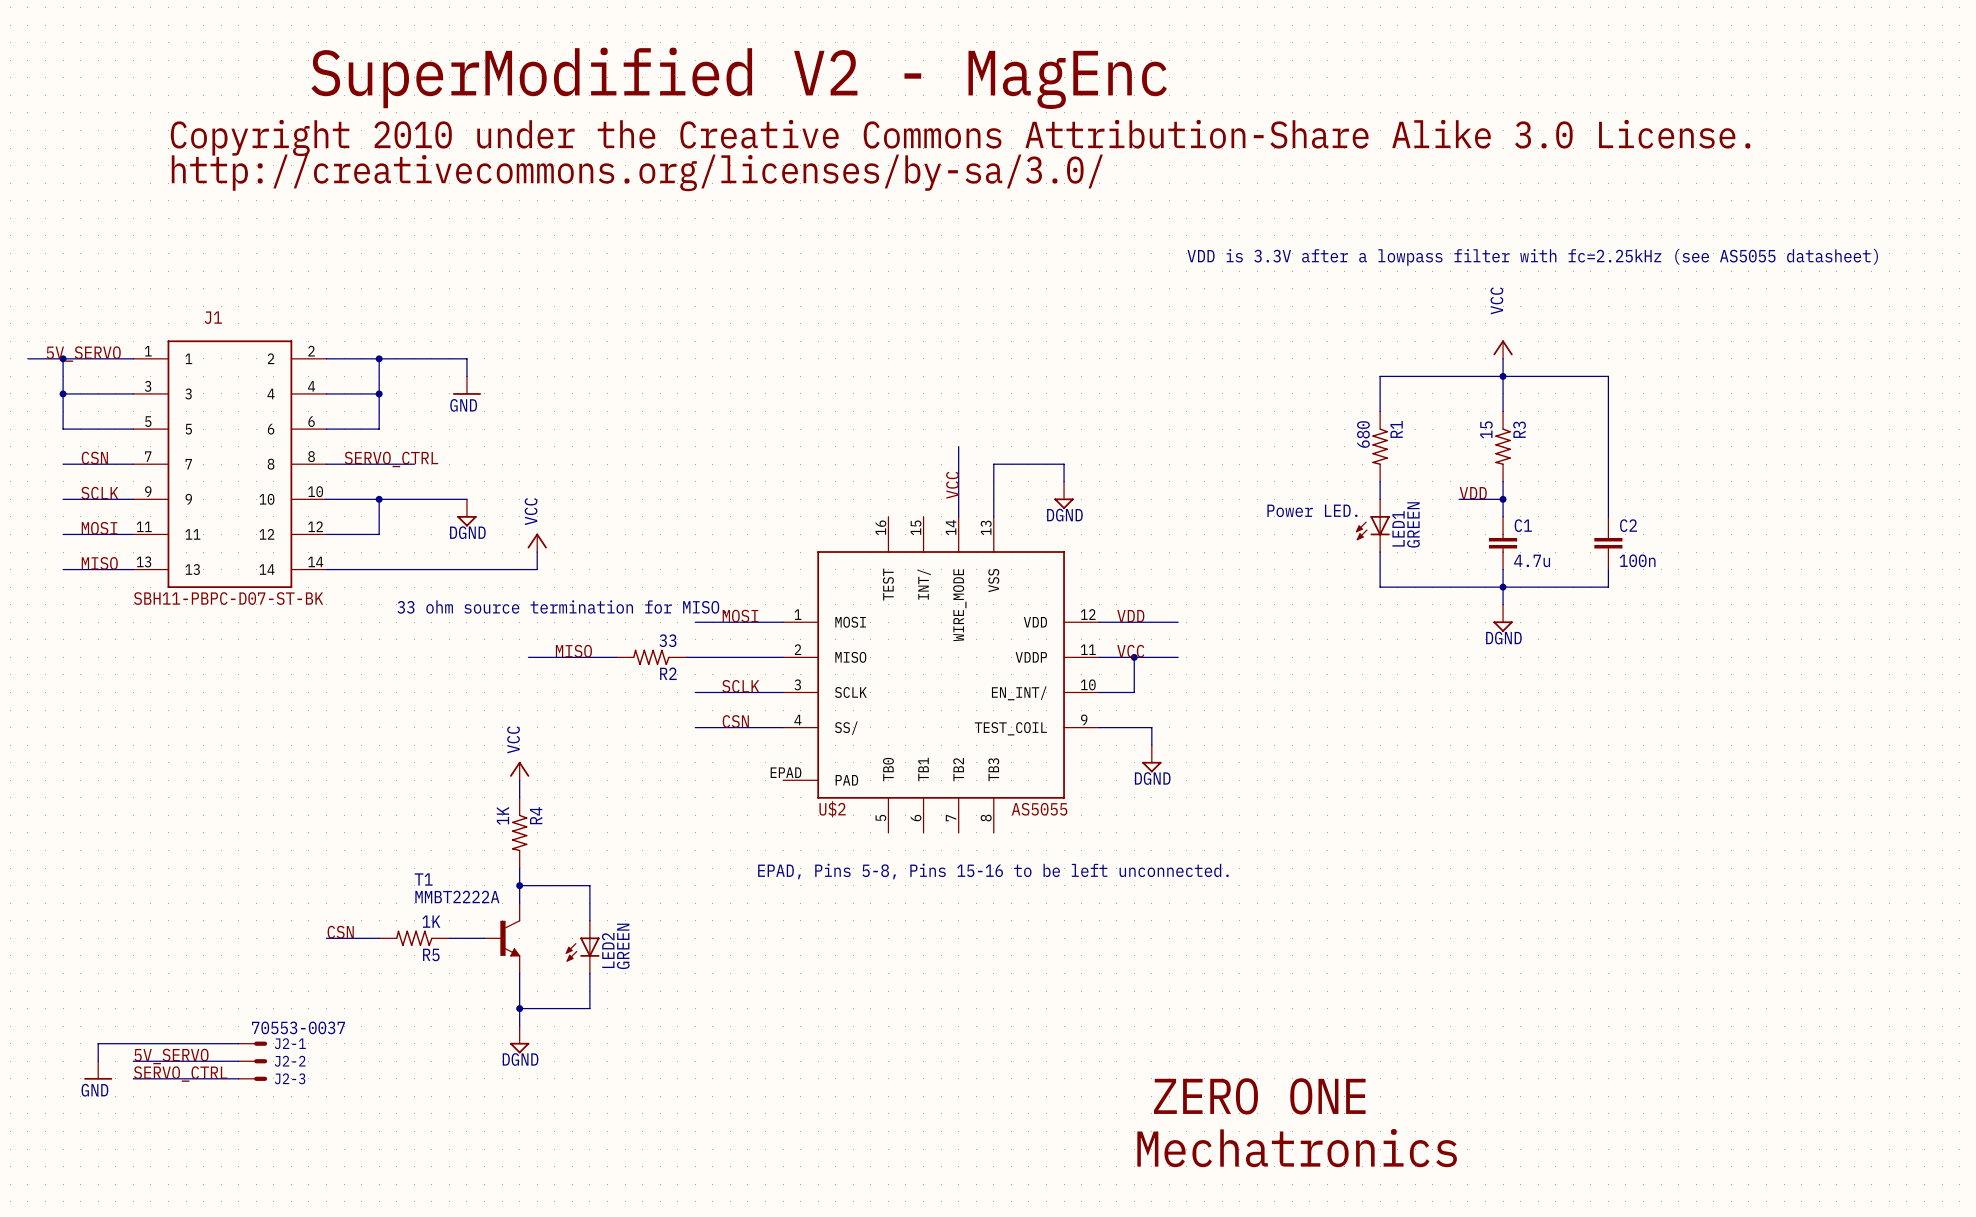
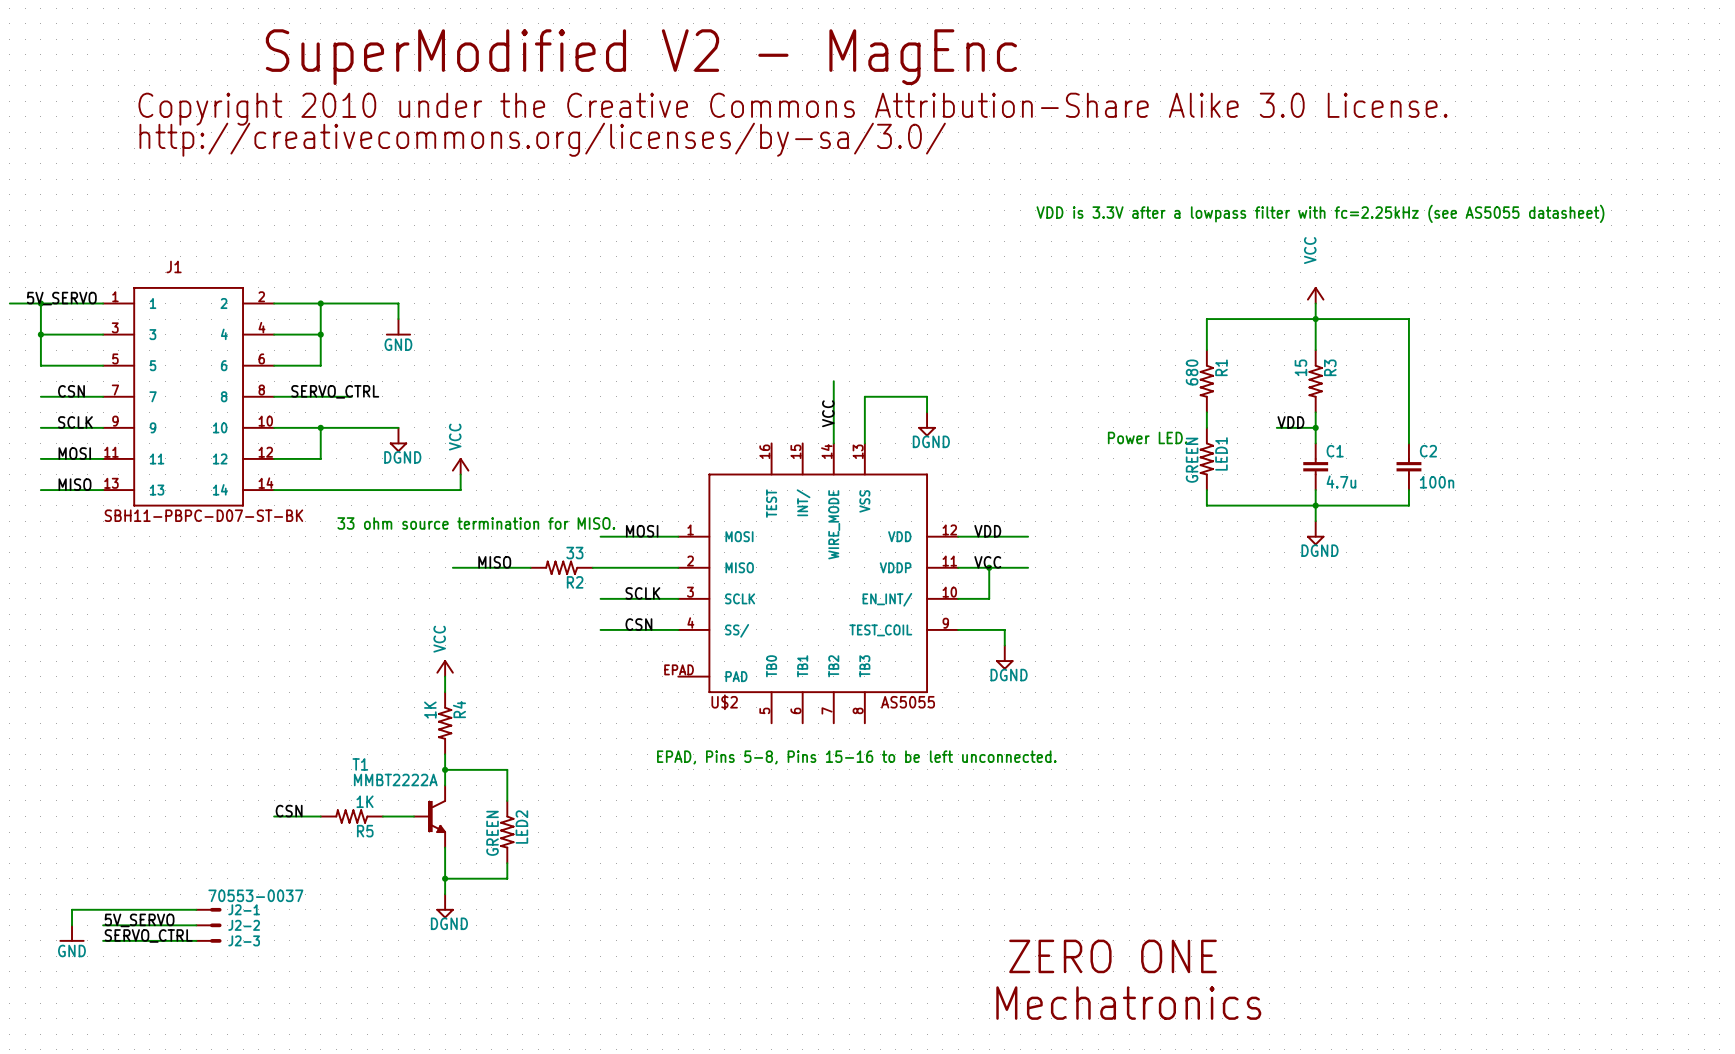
LED1 symbol: [1355, 499, 1390, 553] -> [1200, 427, 1214, 491]
LED1 value position: GREEN (1413, 524) -> GREEN (1192, 460)
LED2 symbol: [565, 920, 600, 974] -> [500, 800, 515, 864]
LED2 value position: GREEN (623, 946) -> GREEN (492, 833)

